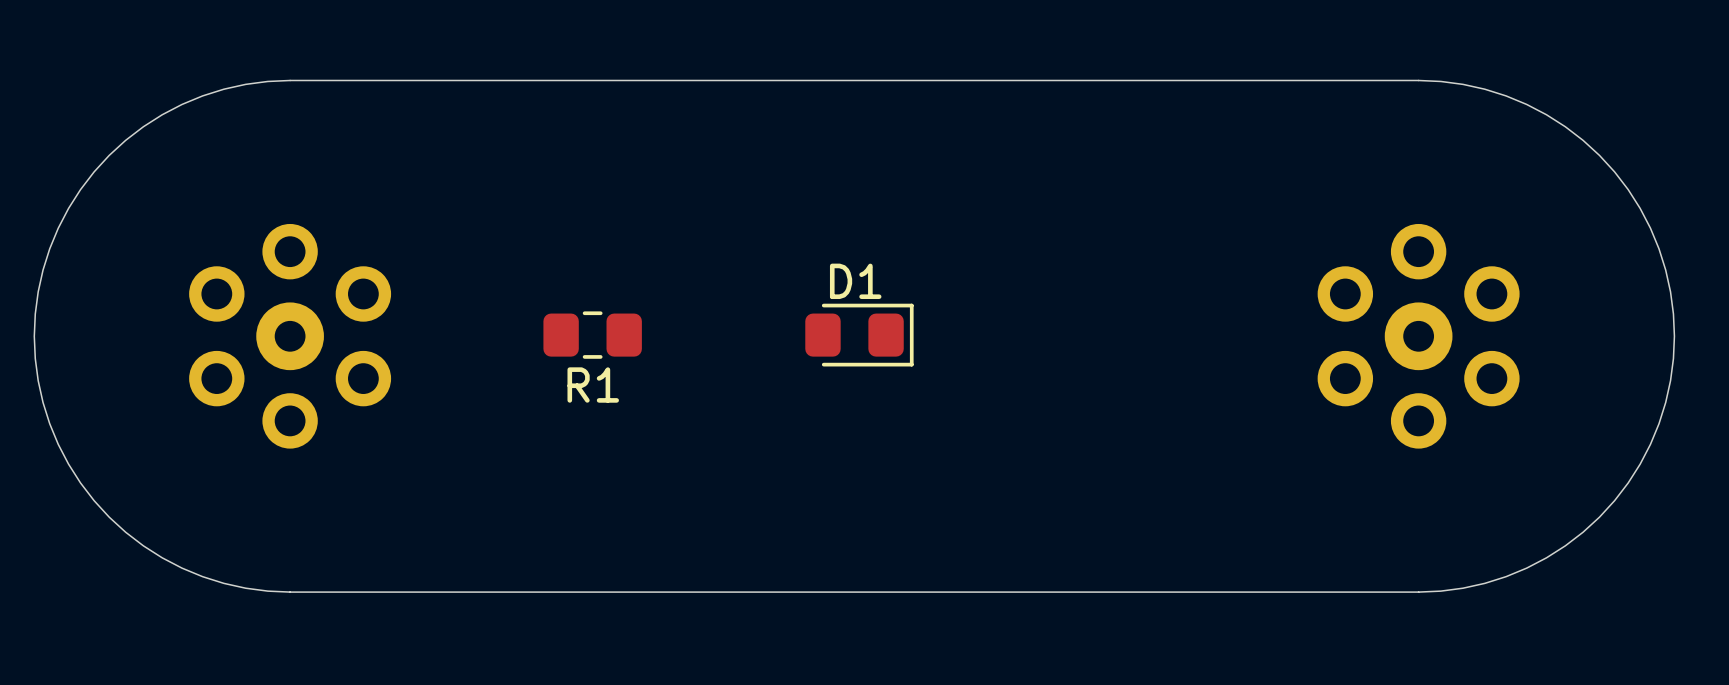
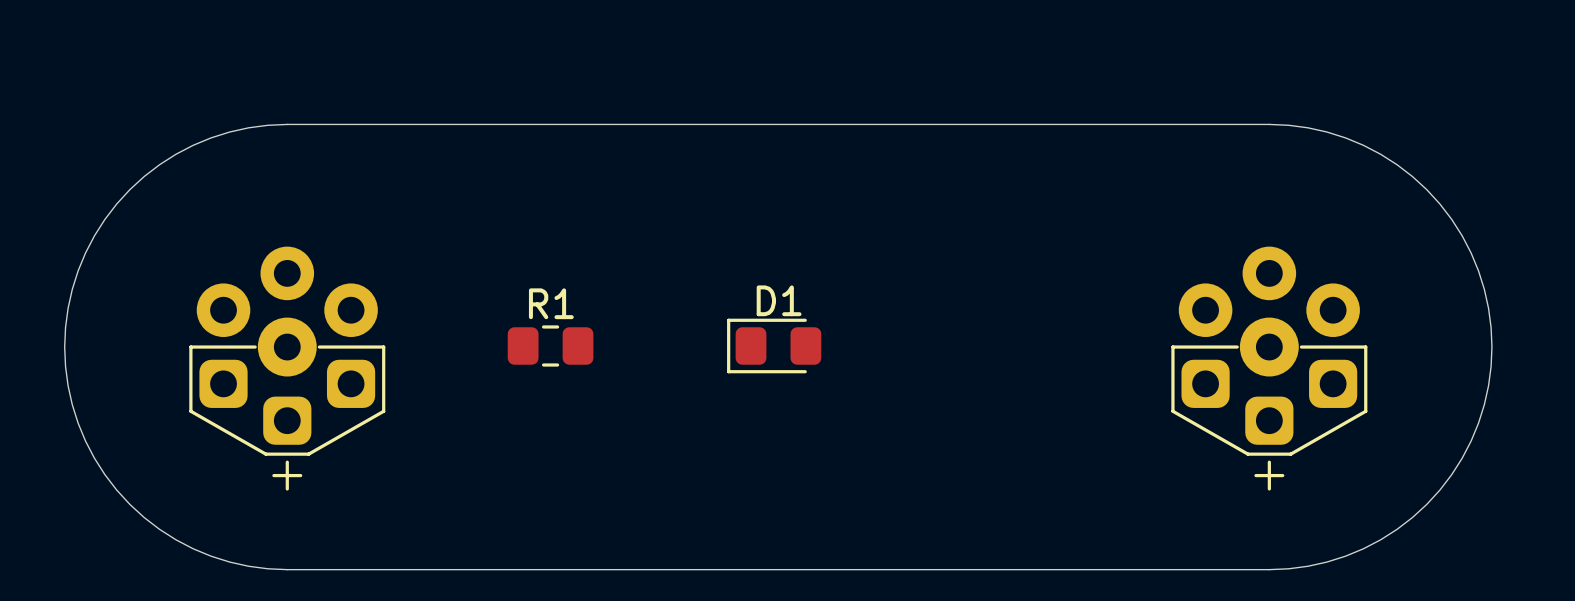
part footprint: [189, 223, 392, 449] -> [189, 246, 386, 491]
part footprint: [1317, 223, 1520, 449] -> [1171, 246, 1368, 491]
D1 rotation: 0° (859, 335) -> 180° (774, 345)
R1 name position: R1 (593, 385) -> R1 (551, 303)

